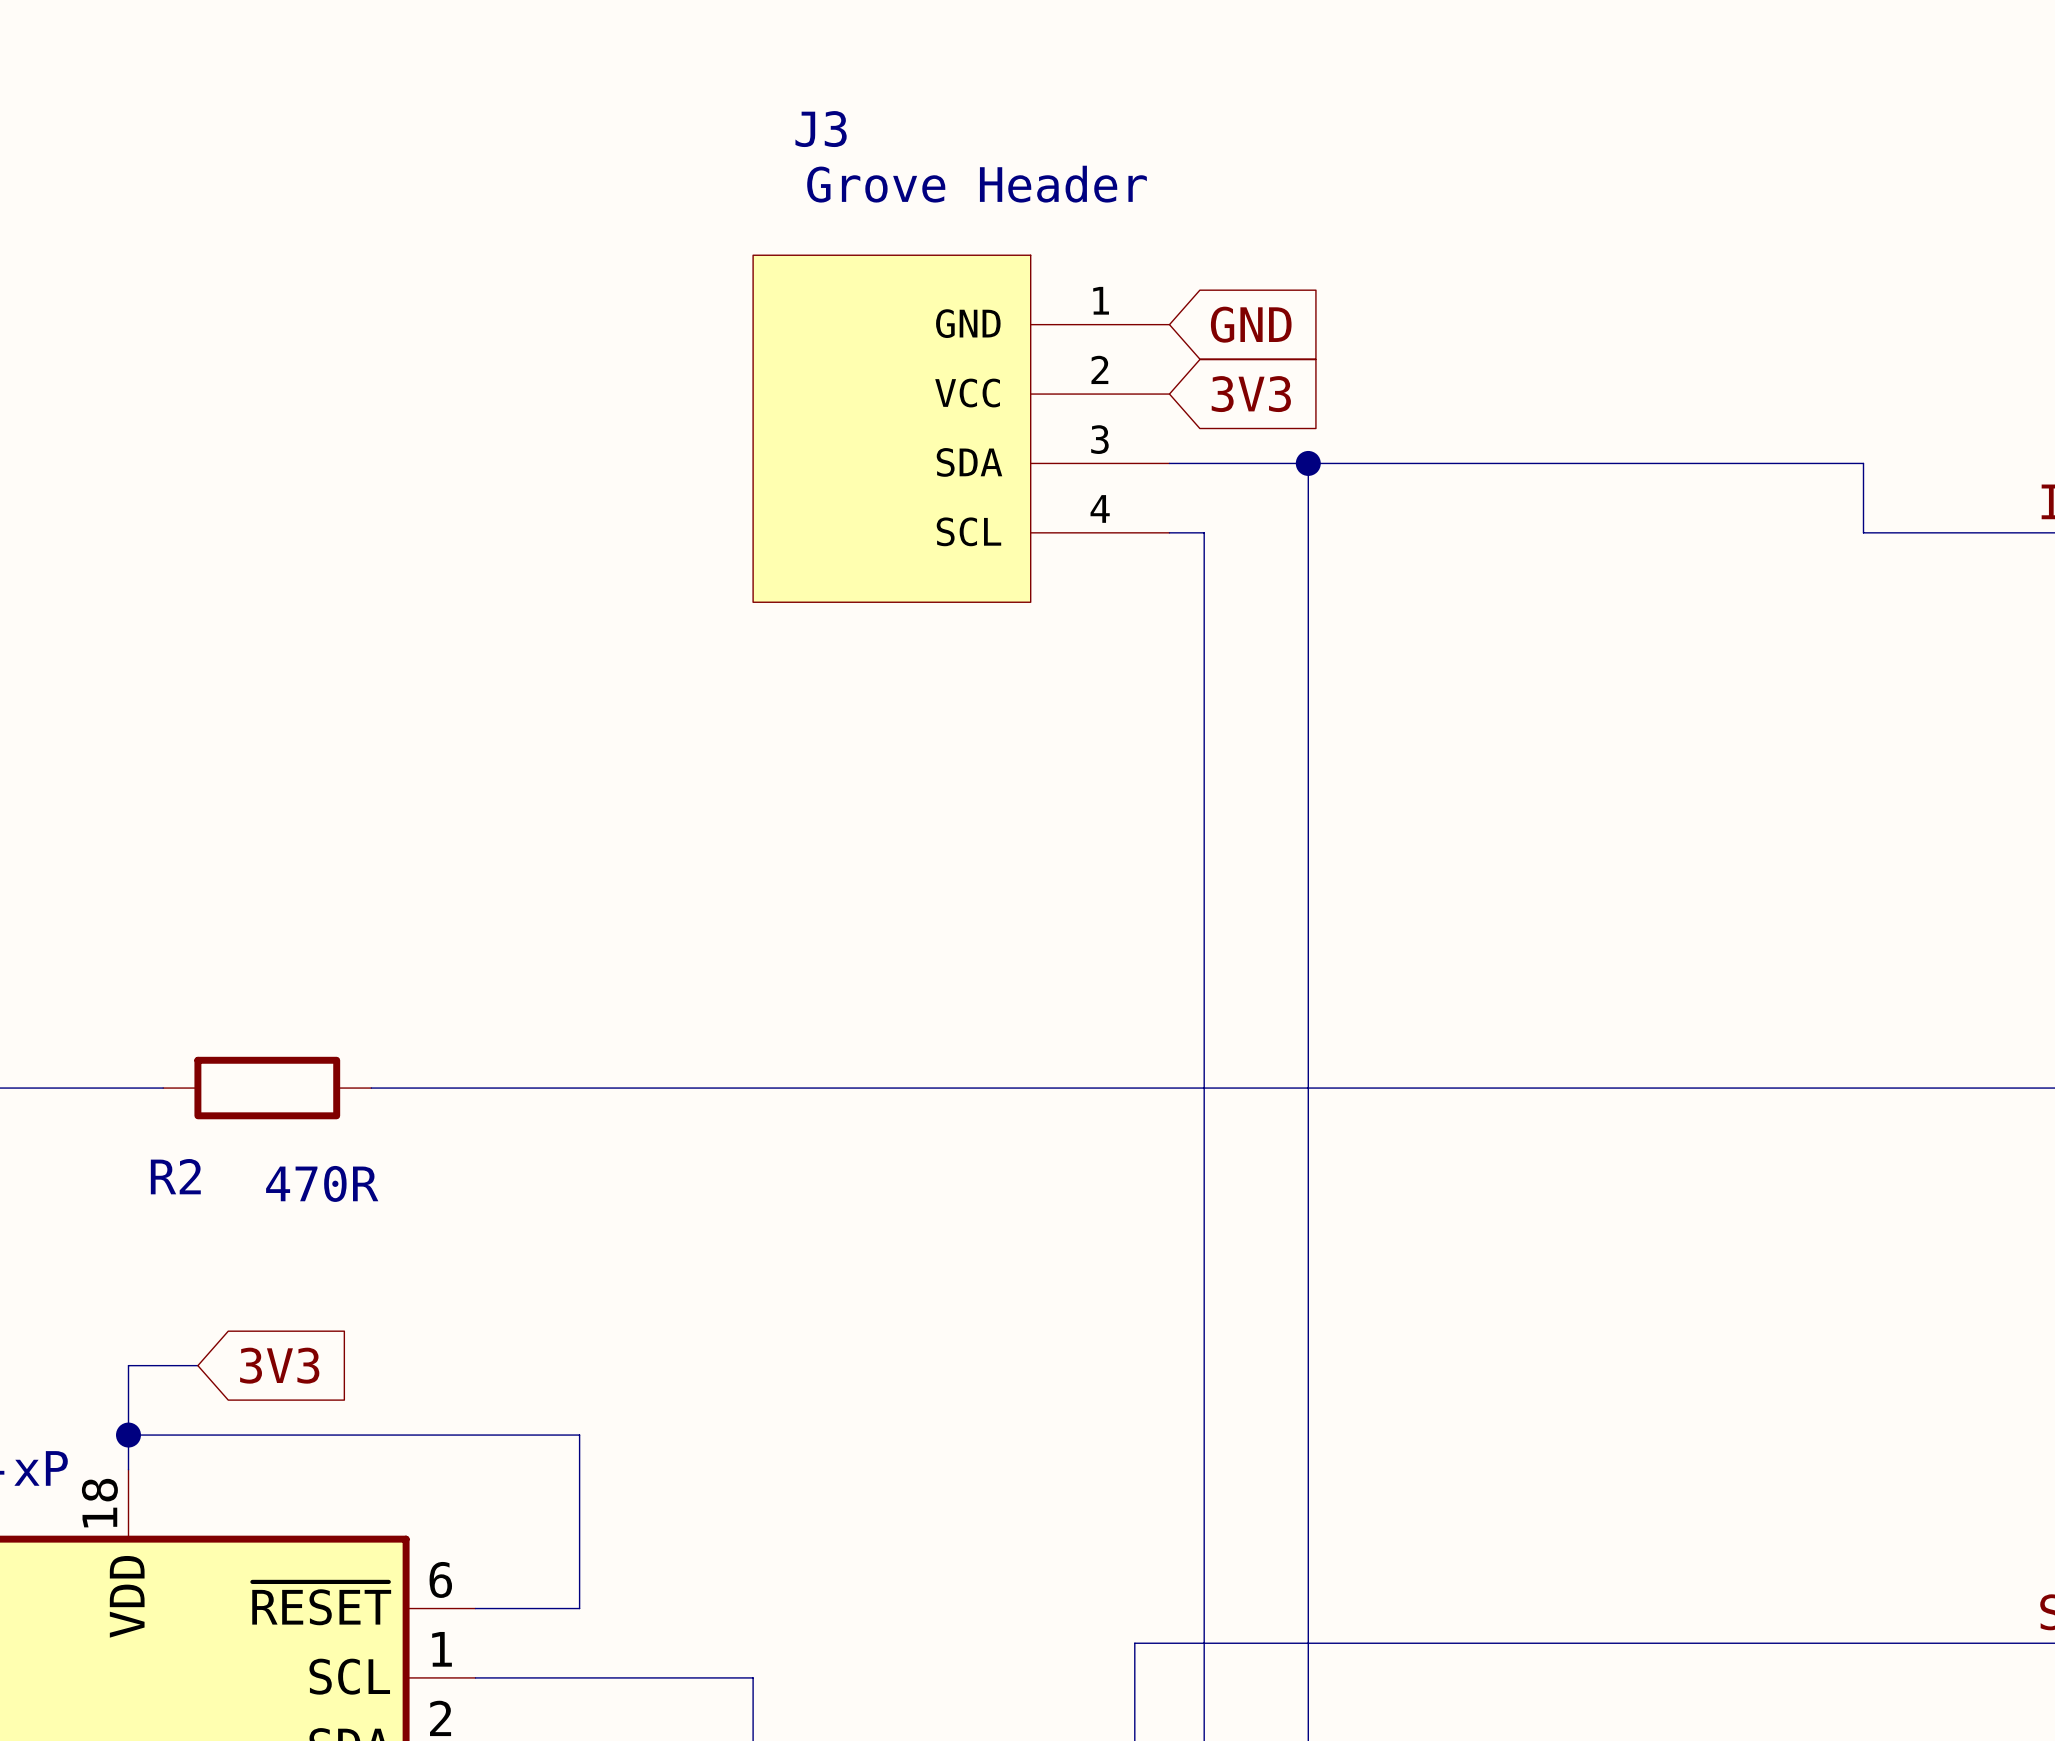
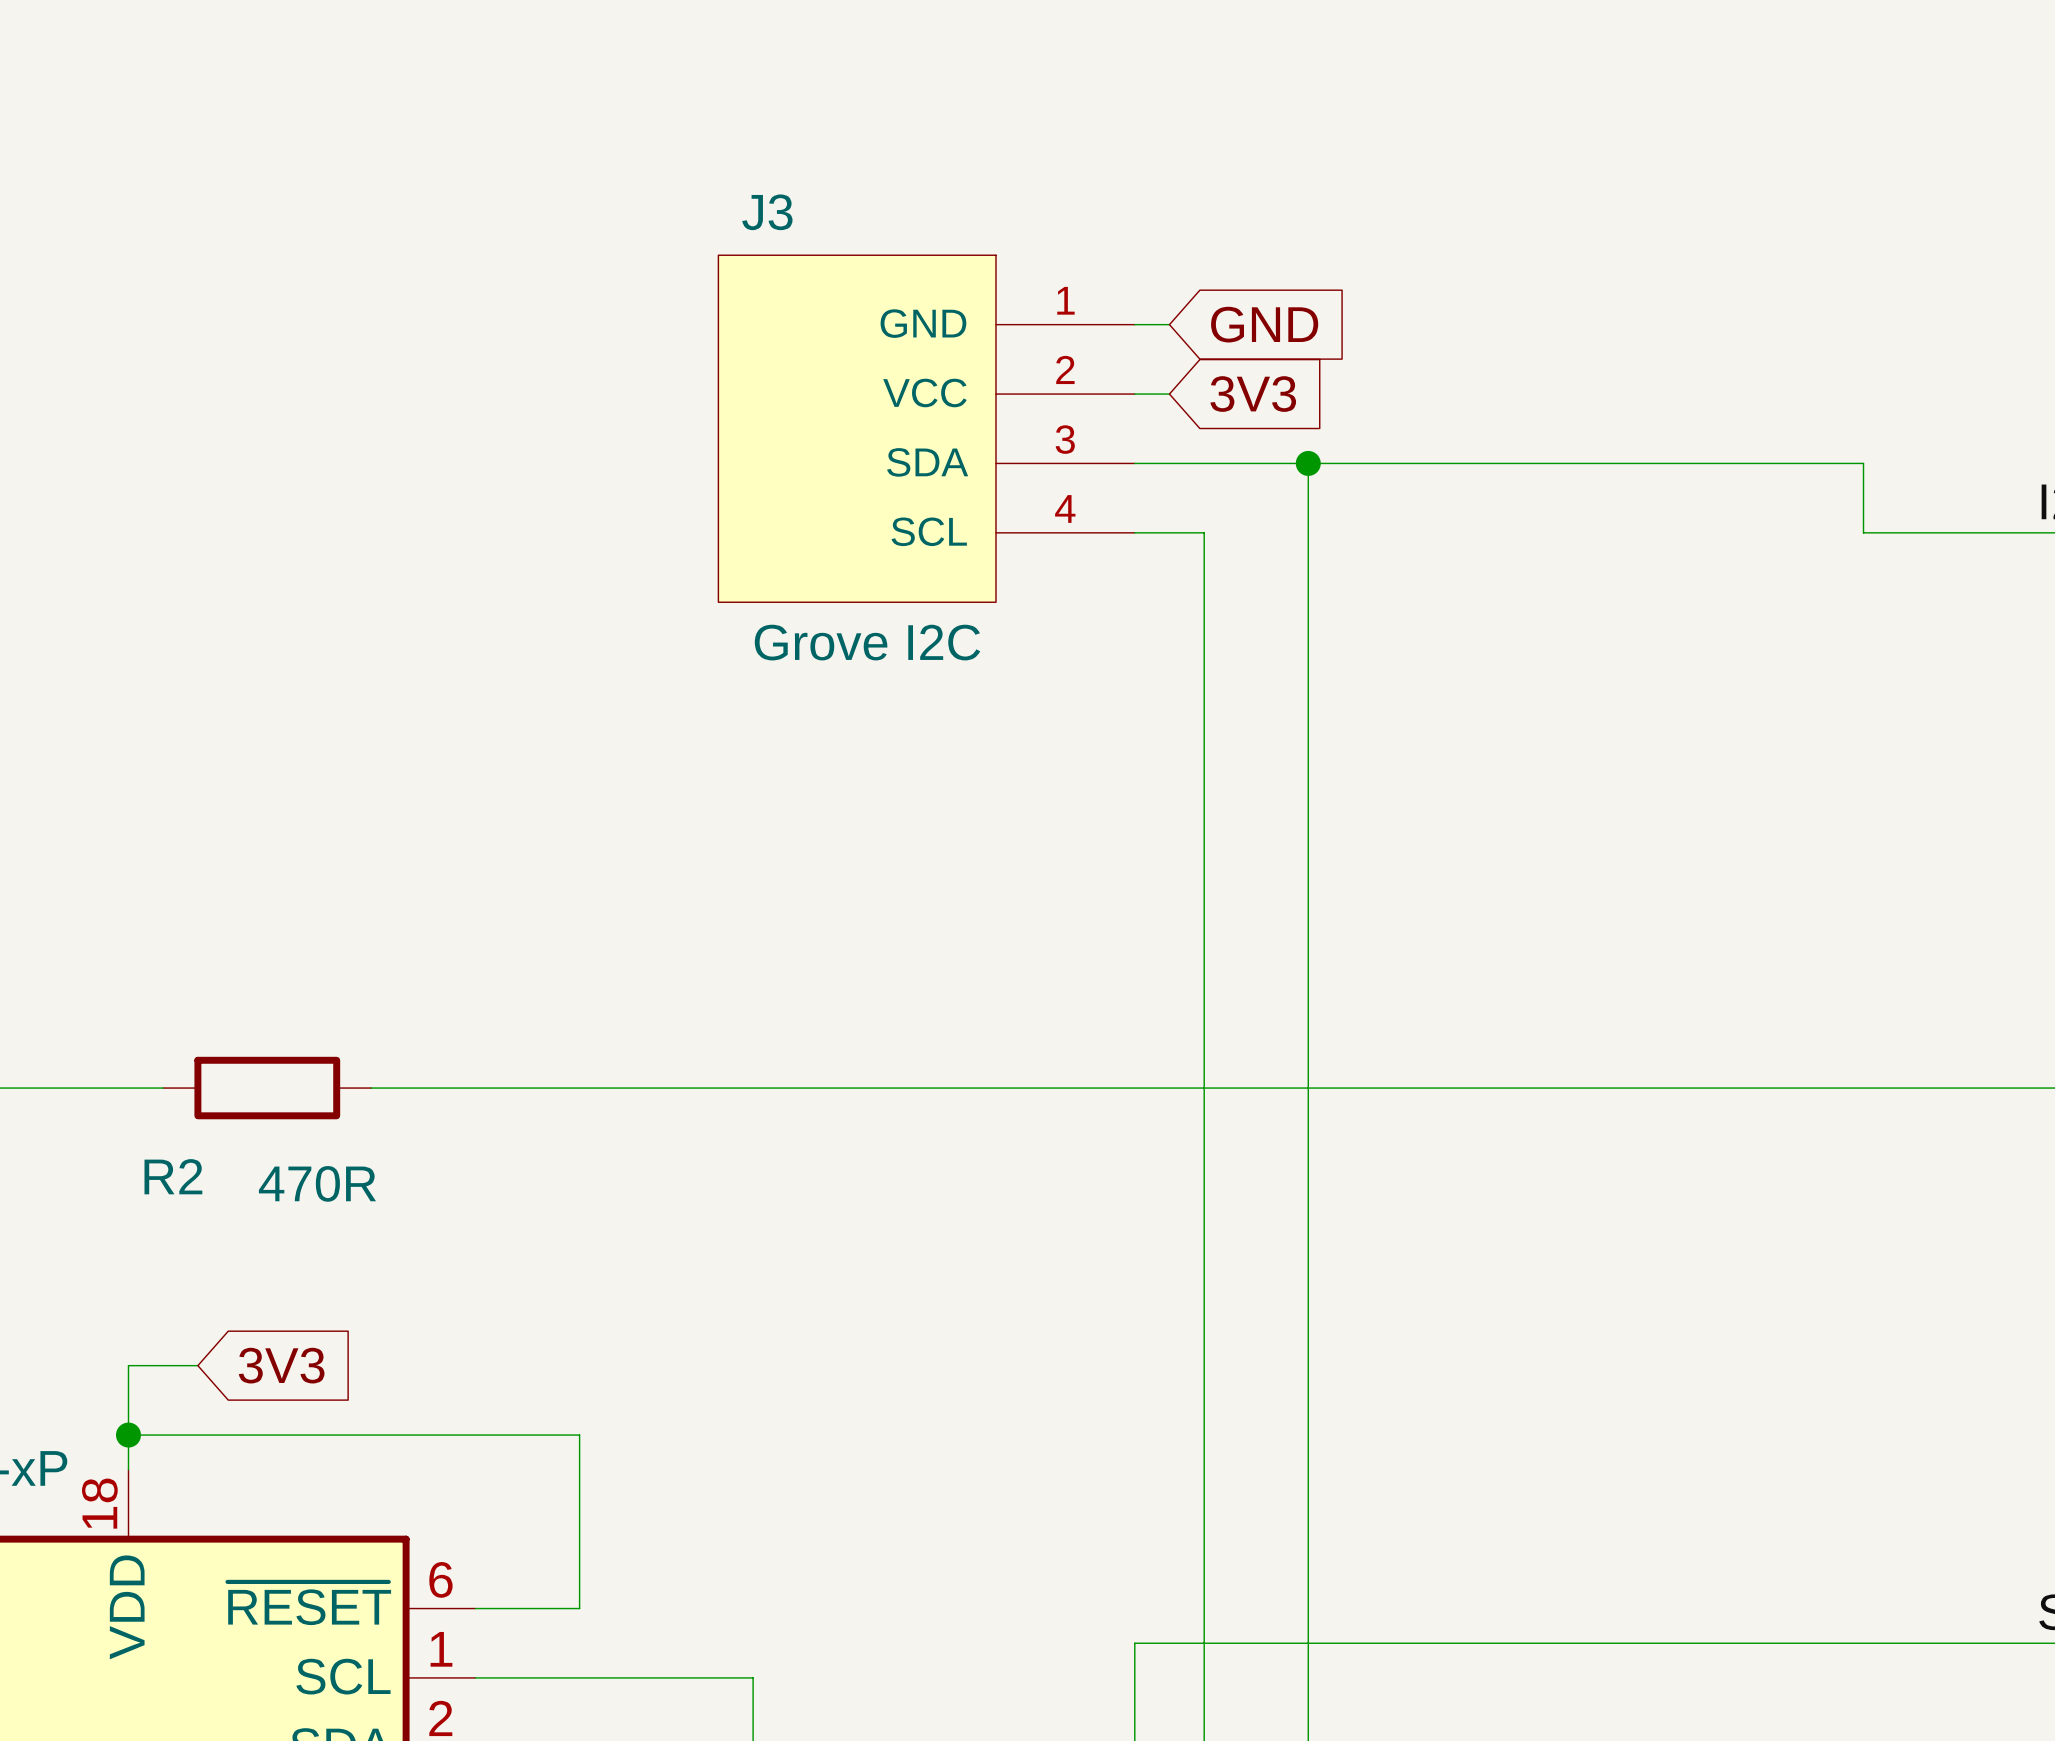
J3 name position: J3 (821, 129) -> J3 (767, 212)
J3 value: Grove Header (977, 184) -> Grove I2C (867, 642)
J3 position: (961, 428) -> (926, 428)

